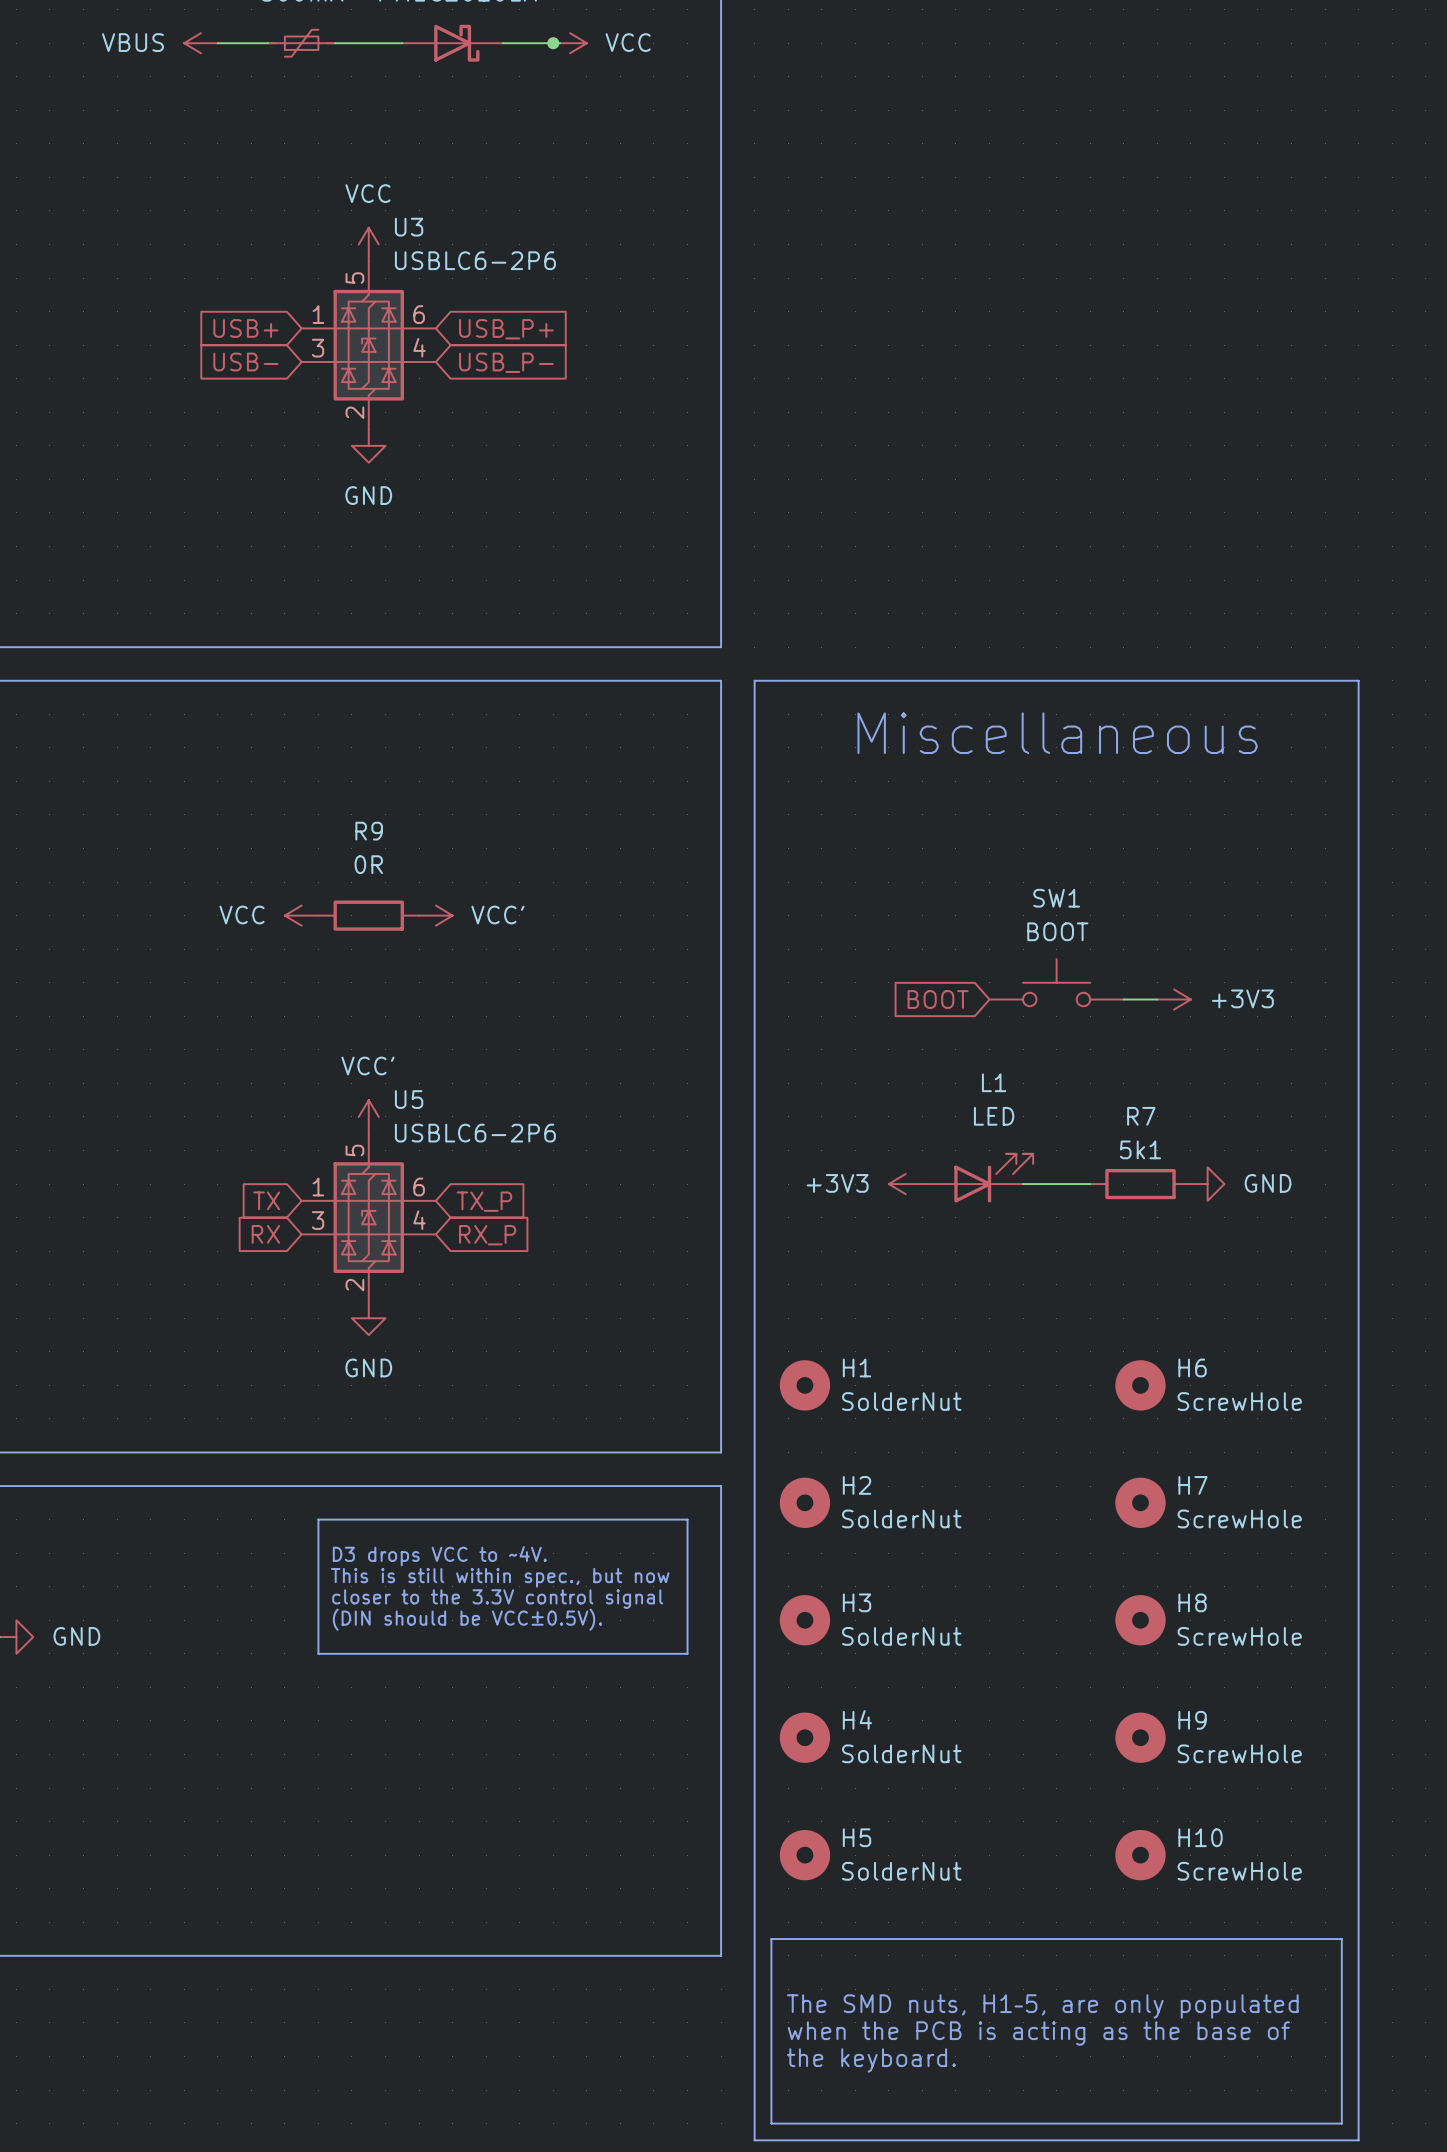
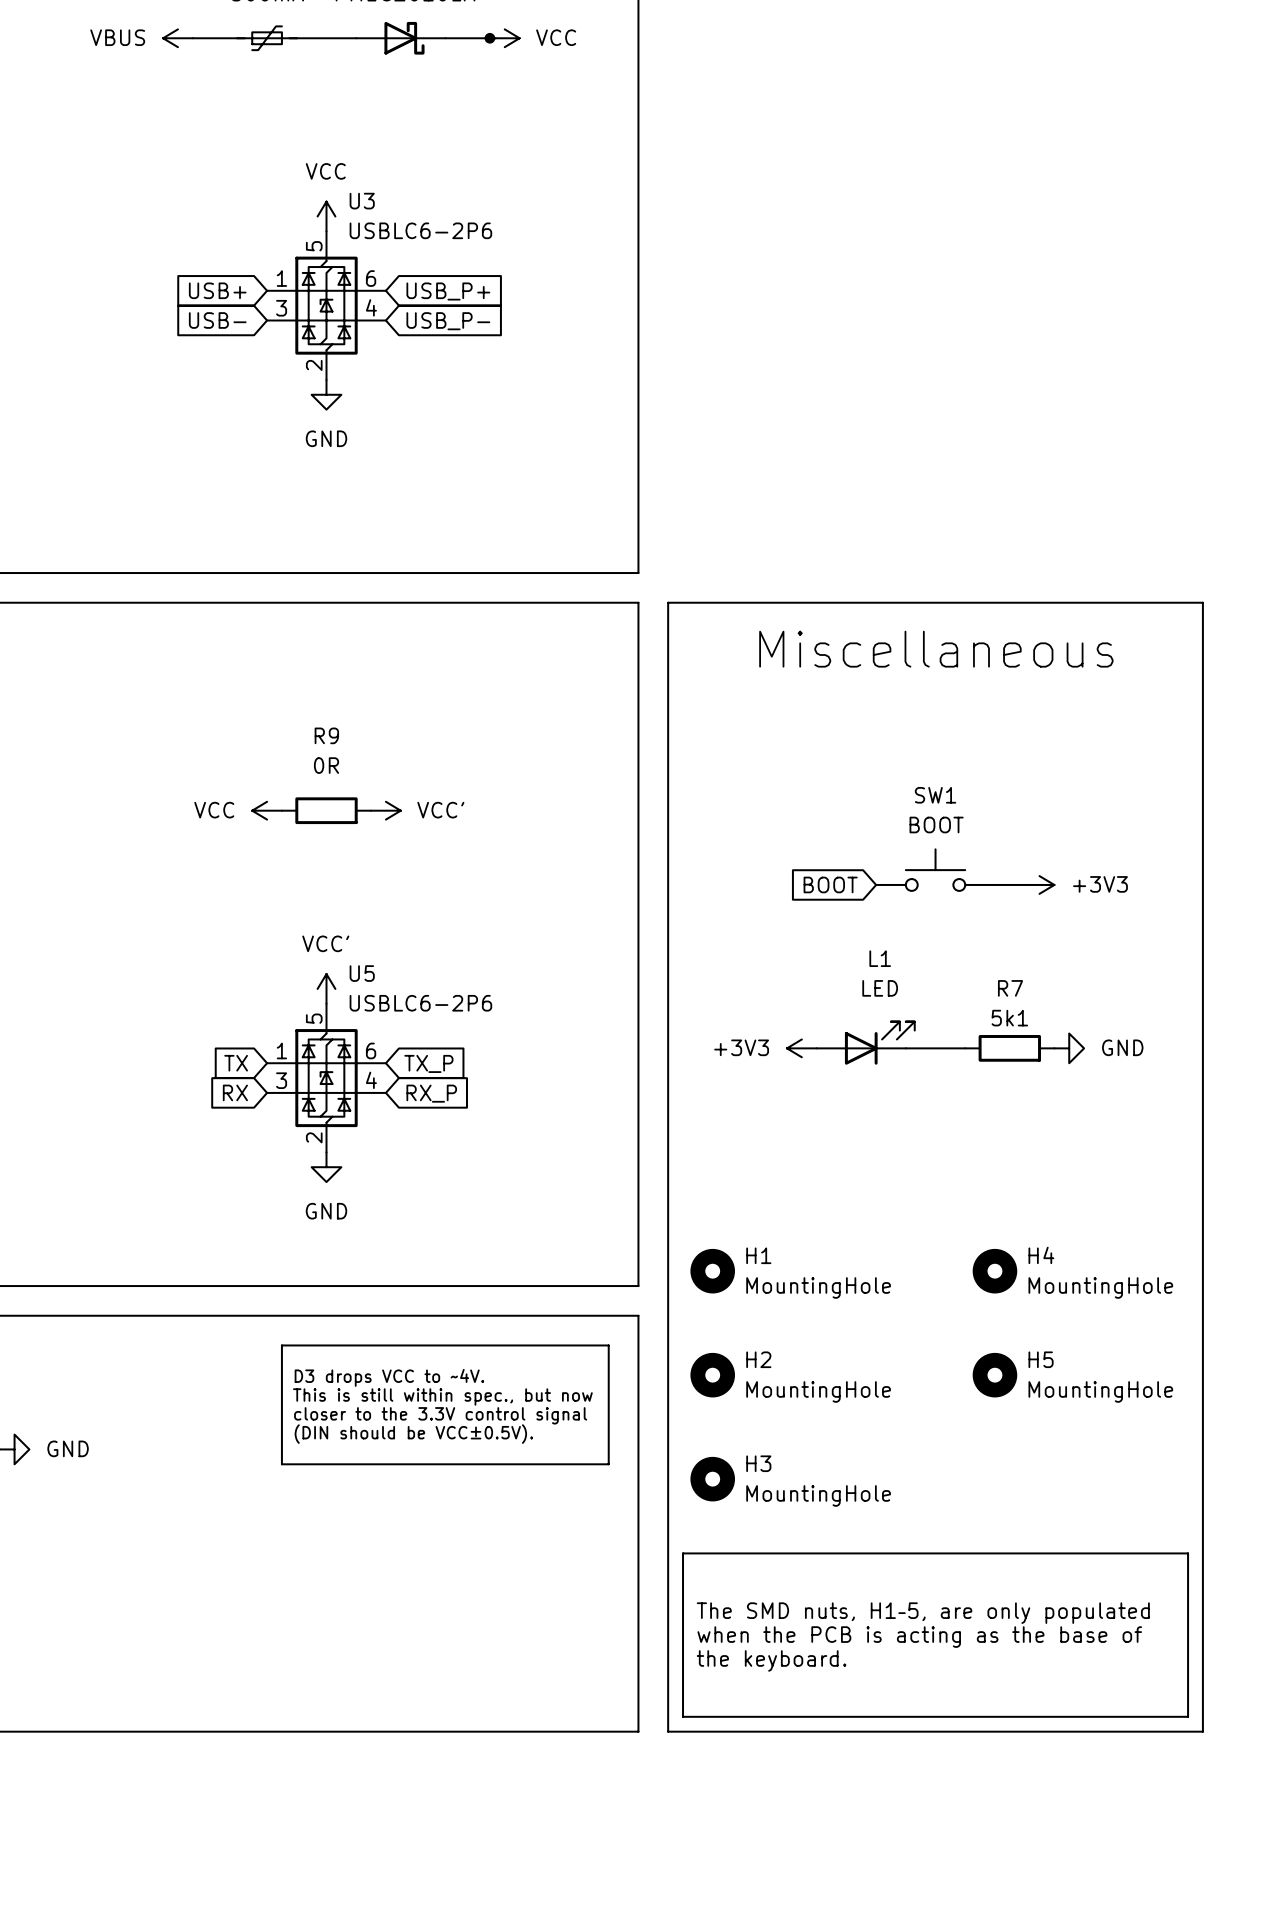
H1 position: (804, 1385) -> (712, 1271)
H6: ScrewHole (1140, 1385) -> none
H1 value: SolderNut (901, 1401) -> MountingHole (818, 1287)
H2 position: (804, 1502) -> (712, 1375)
H7: ScrewHole (1140, 1502) -> none
H2 value: SolderNut (901, 1518) -> MountingHole (818, 1391)
H3 position: (804, 1620) -> (712, 1479)
H8: ScrewHole (1140, 1620) -> none
H3 value: SolderNut (901, 1636) -> MountingHole (818, 1495)
H4 position: (804, 1737) -> (994, 1271)
H9: ScrewHole (1140, 1737) -> none
H4 value: SolderNut (901, 1753) -> MountingHole (1100, 1287)
H5 position: (804, 1855) -> (994, 1375)
H10: ScrewHole (1140, 1855) -> none
H5 value: SolderNut (901, 1871) -> MountingHole (1100, 1391)
line: (771, 1939) (771, 2123) (1341, 2123) (1341, 1939) -> (683, 1716) (683, 1553) (1188, 1553) (1188, 1716)
line: (754, 1955) (754, 2140) (1358, 2140) (1358, 1955) -> (668, 1731) (1202, 1731)
text position: The SMD nuts, H1–5, are only populated (1042, 2006) -> The SMD nuts, H1–5, are only populated (923, 1613)
text position: when the PCB is acting as the base of (1038, 2033) -> when the PCB is acting as the base of (919, 1637)
text position: the keyboard. (871, 2060) -> the keyboard. (771, 1660)

